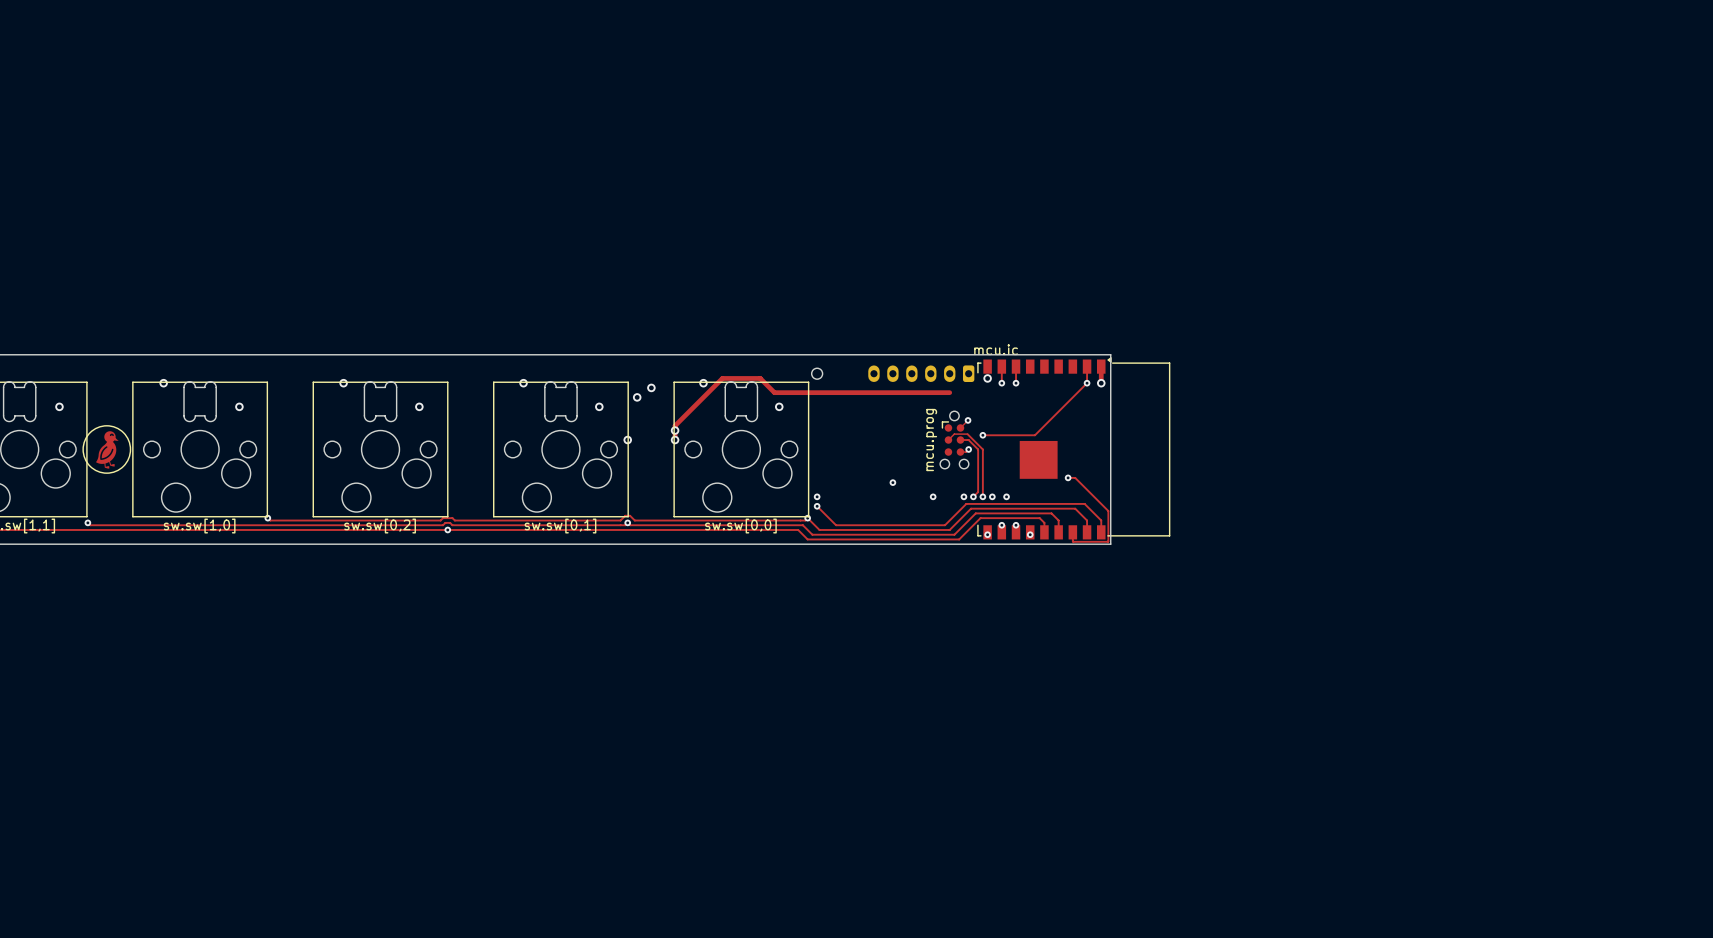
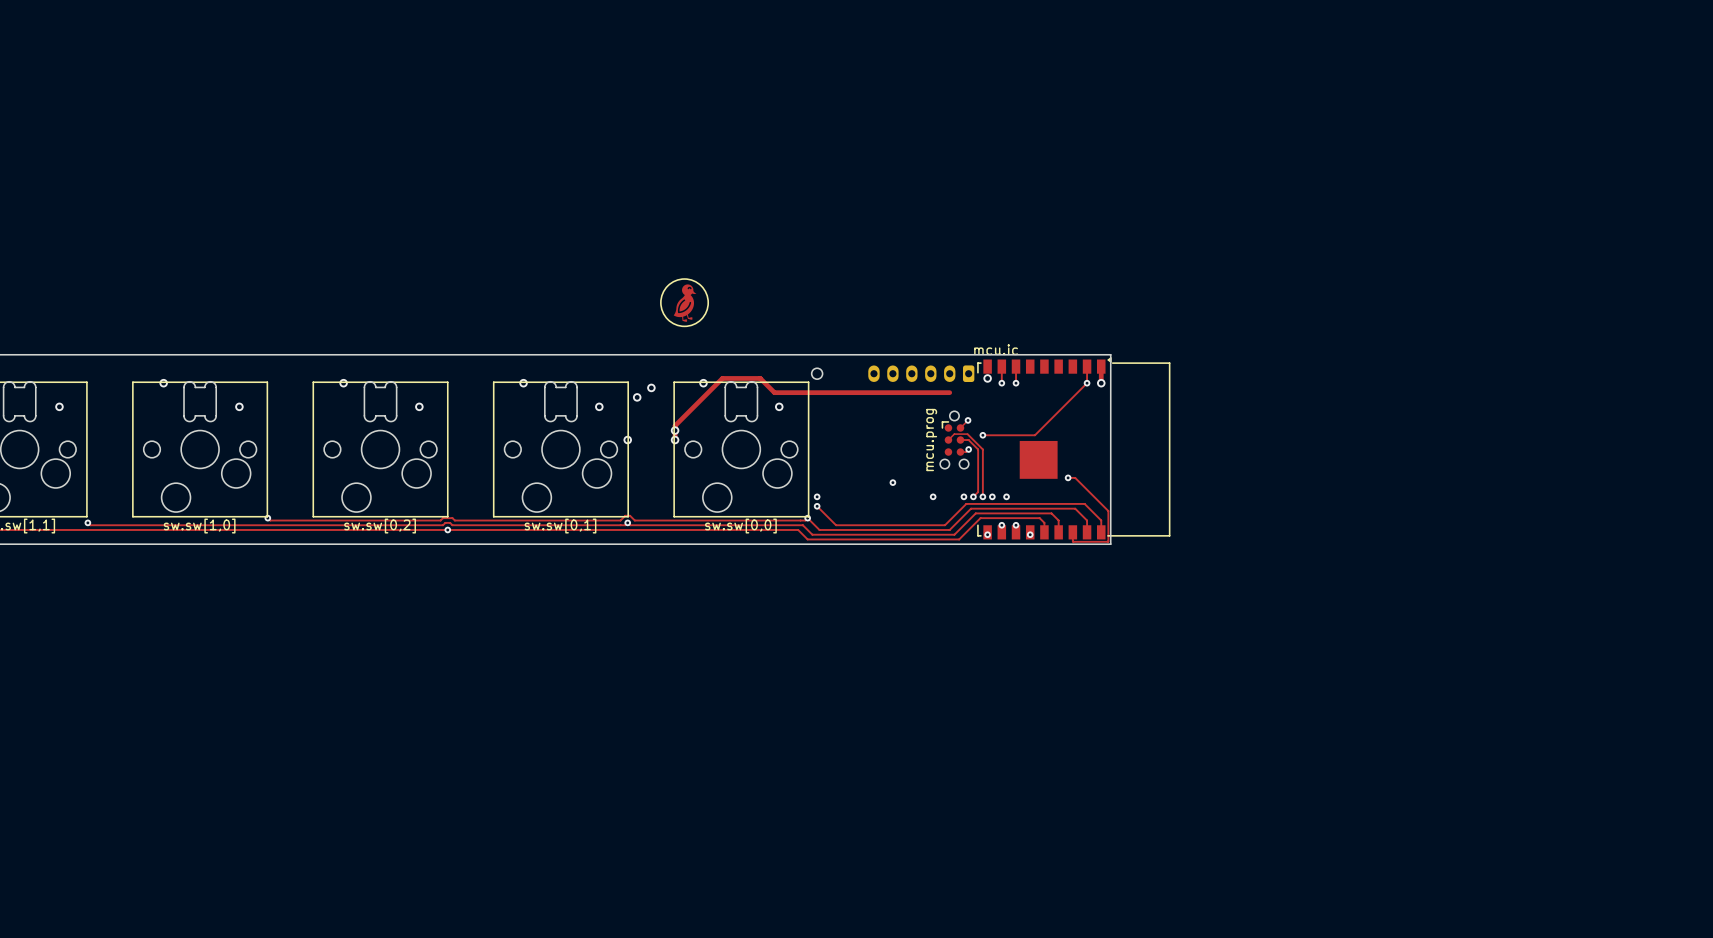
part: none -> (684, 302)
part: (106, 449) -> none

